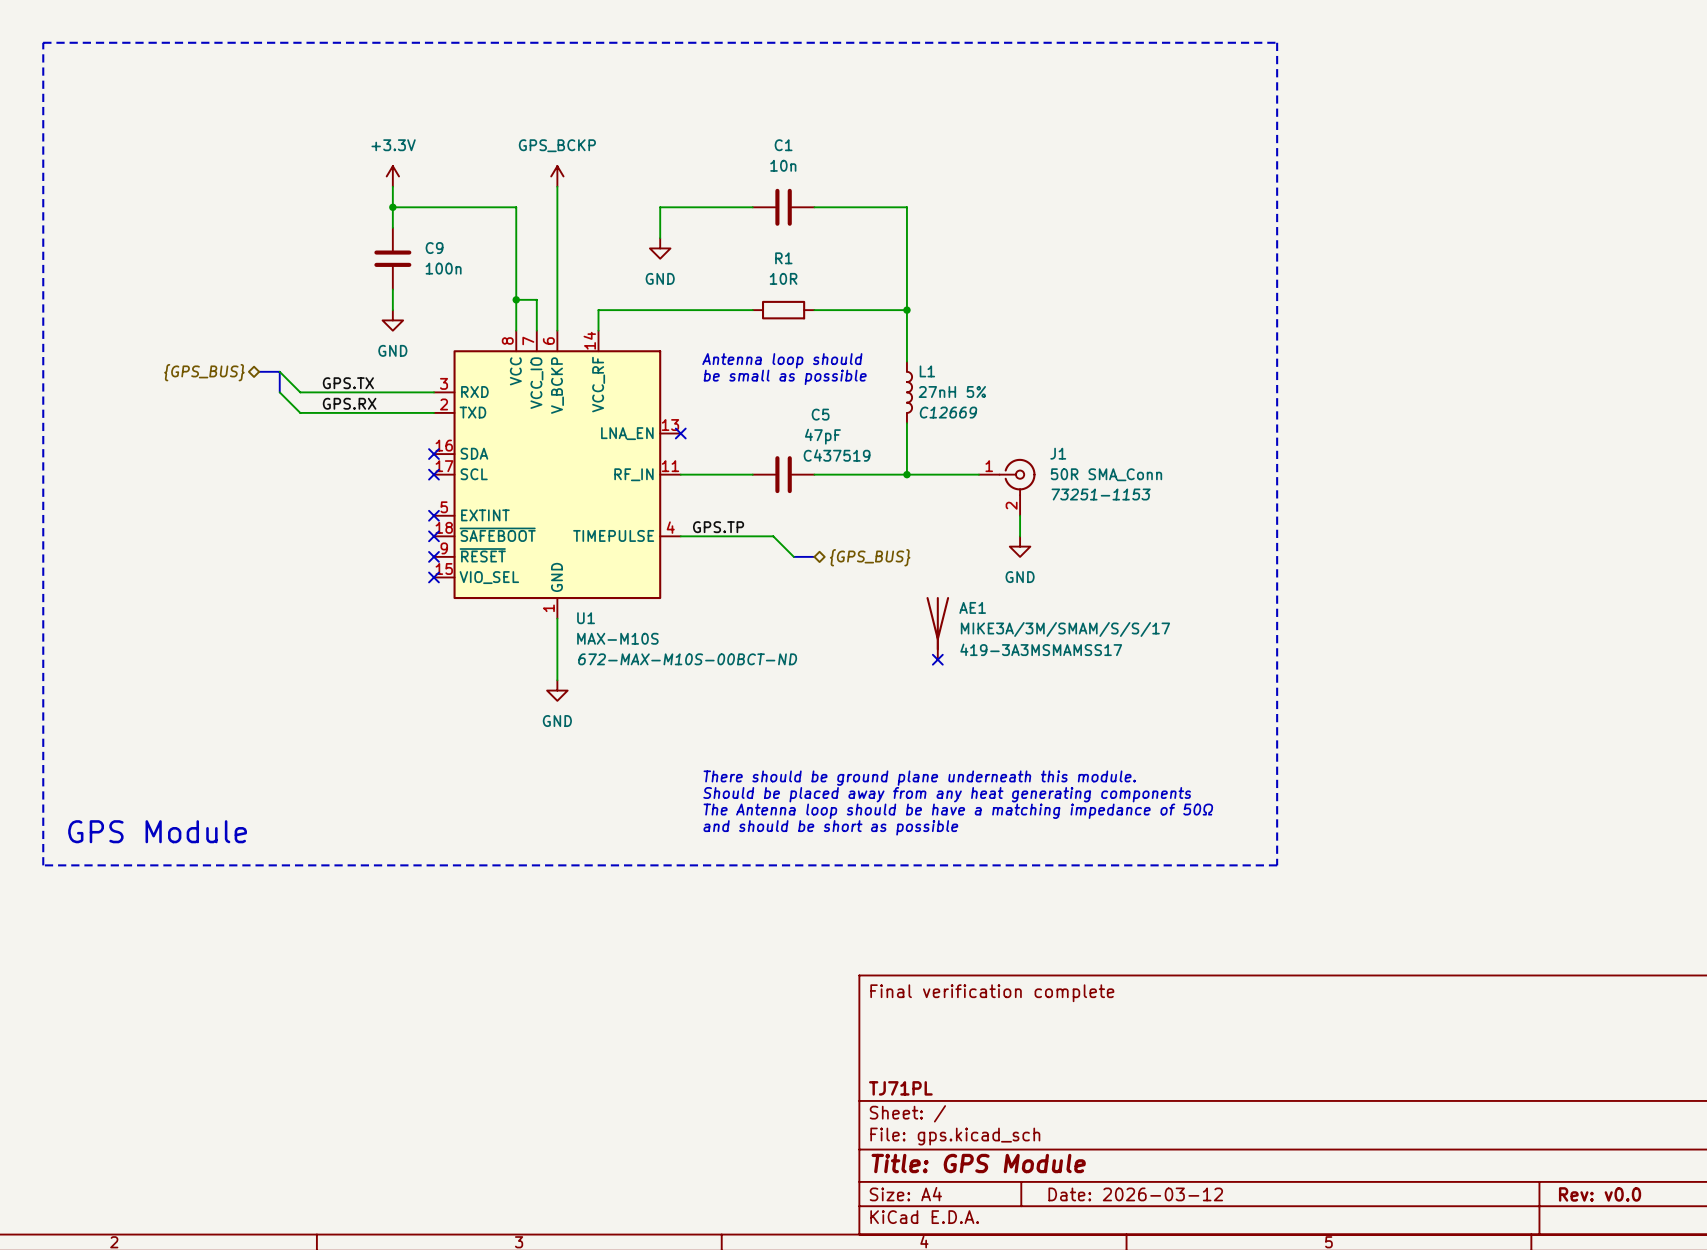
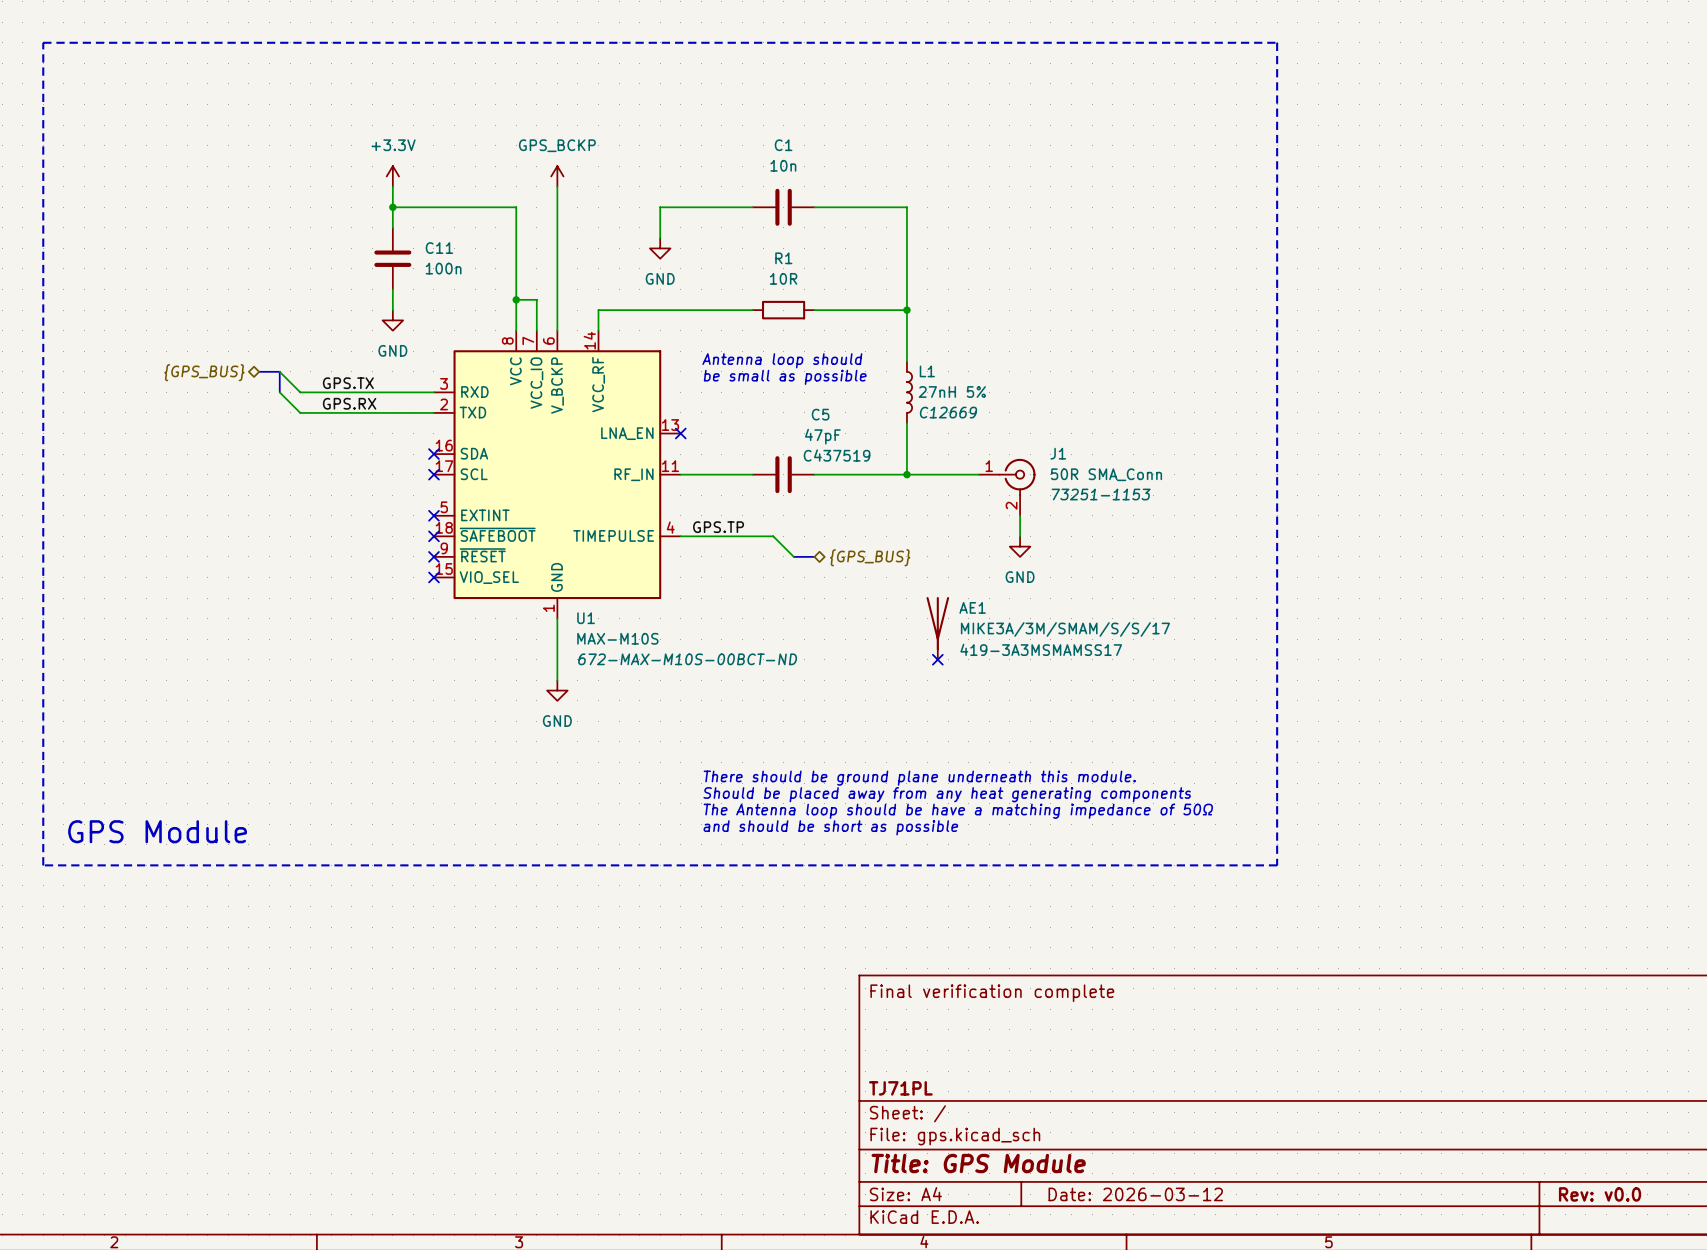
C9 name: C9 (434, 248) -> C11 (439, 248)

